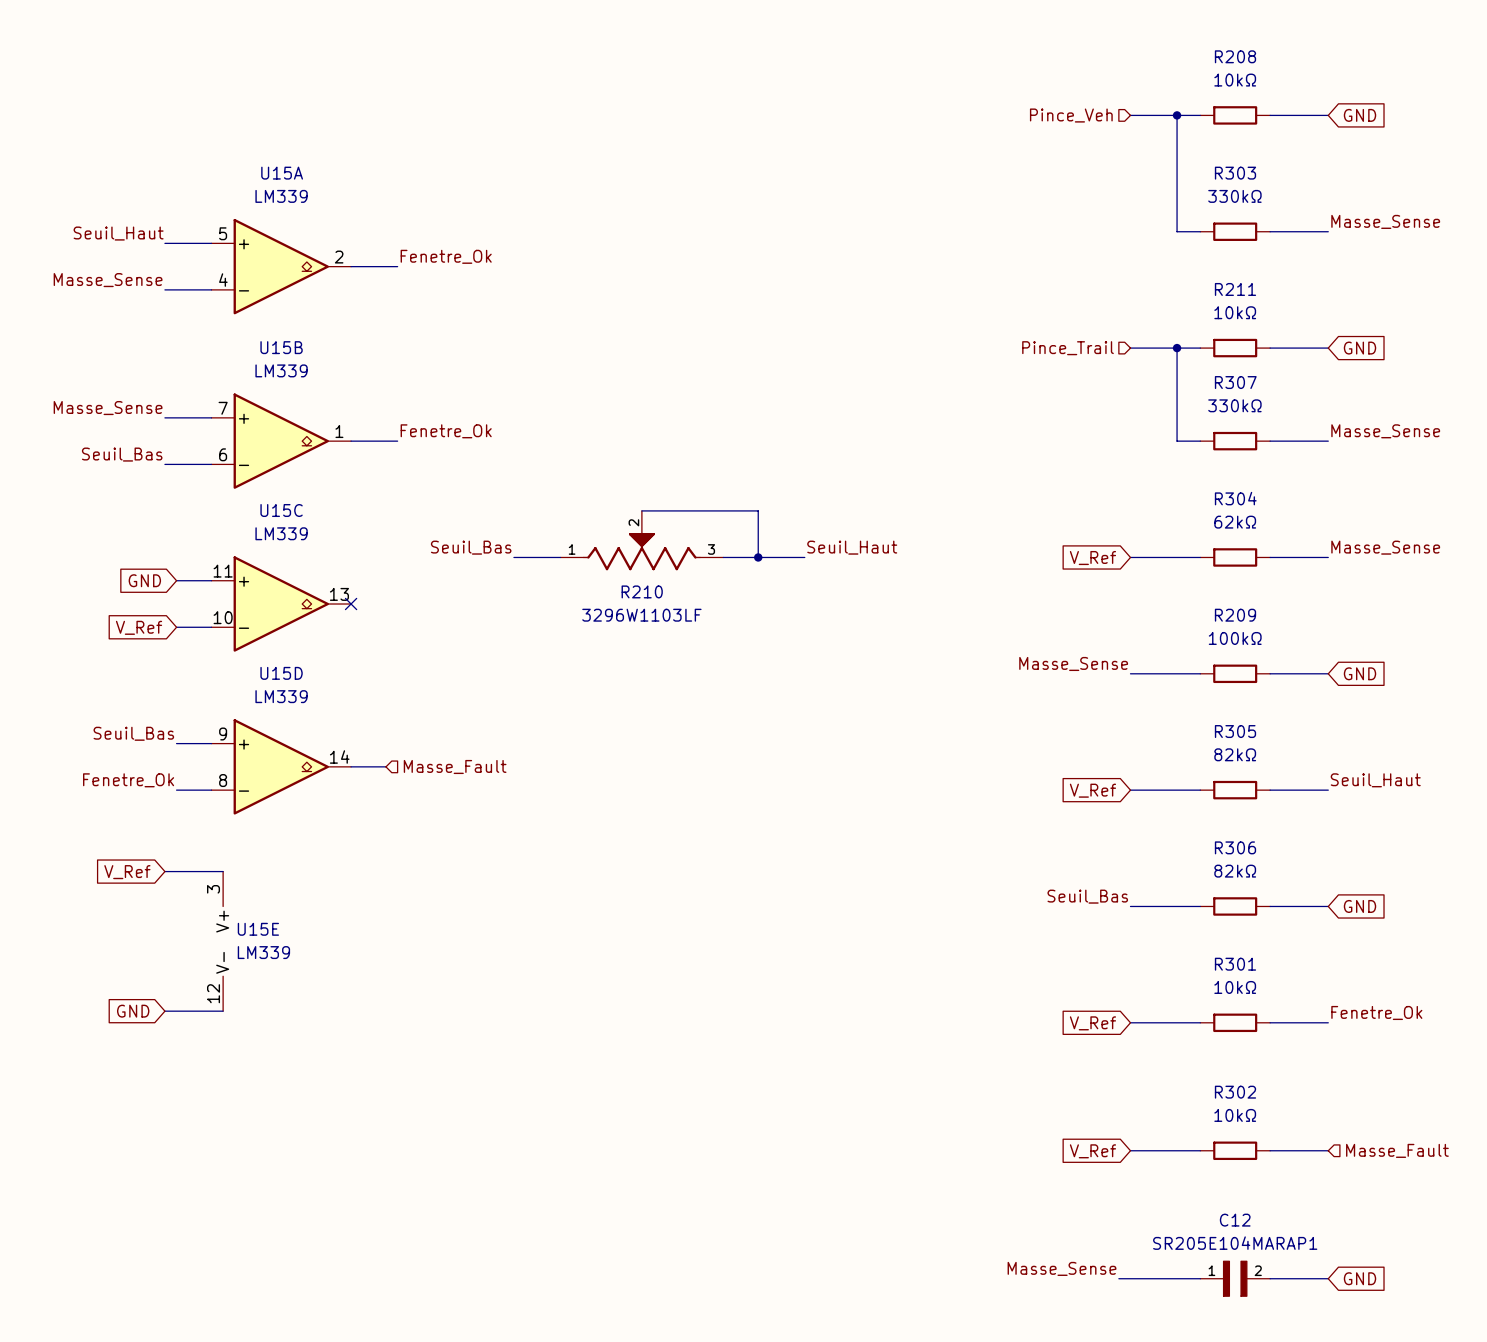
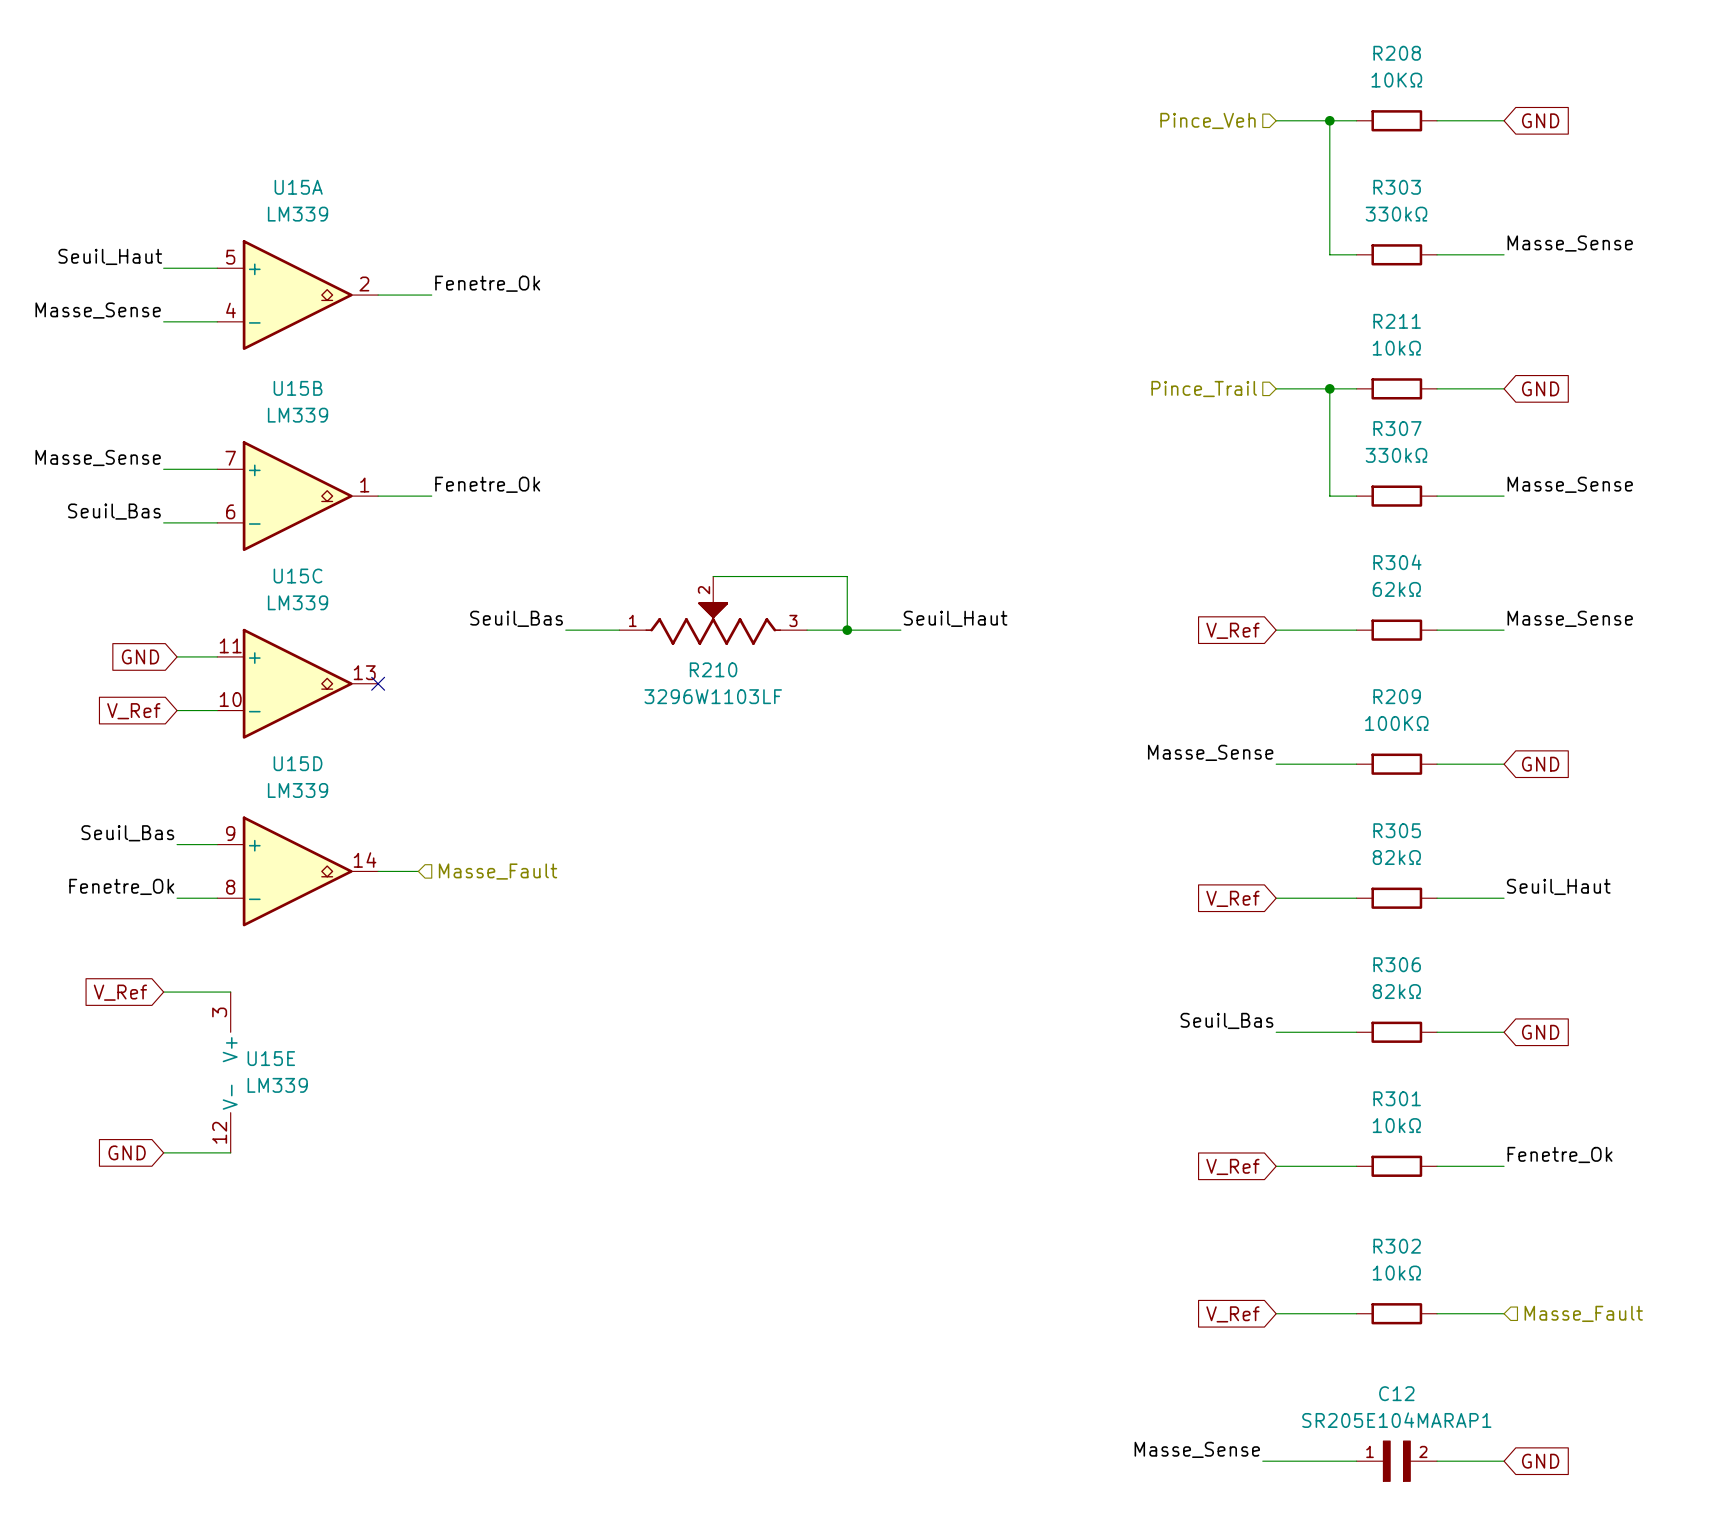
R208 value: 10kΩ (1235, 80) -> 10KΩ (1396, 80)
R209 value: 100kΩ (1235, 638) -> 100KΩ (1396, 723)

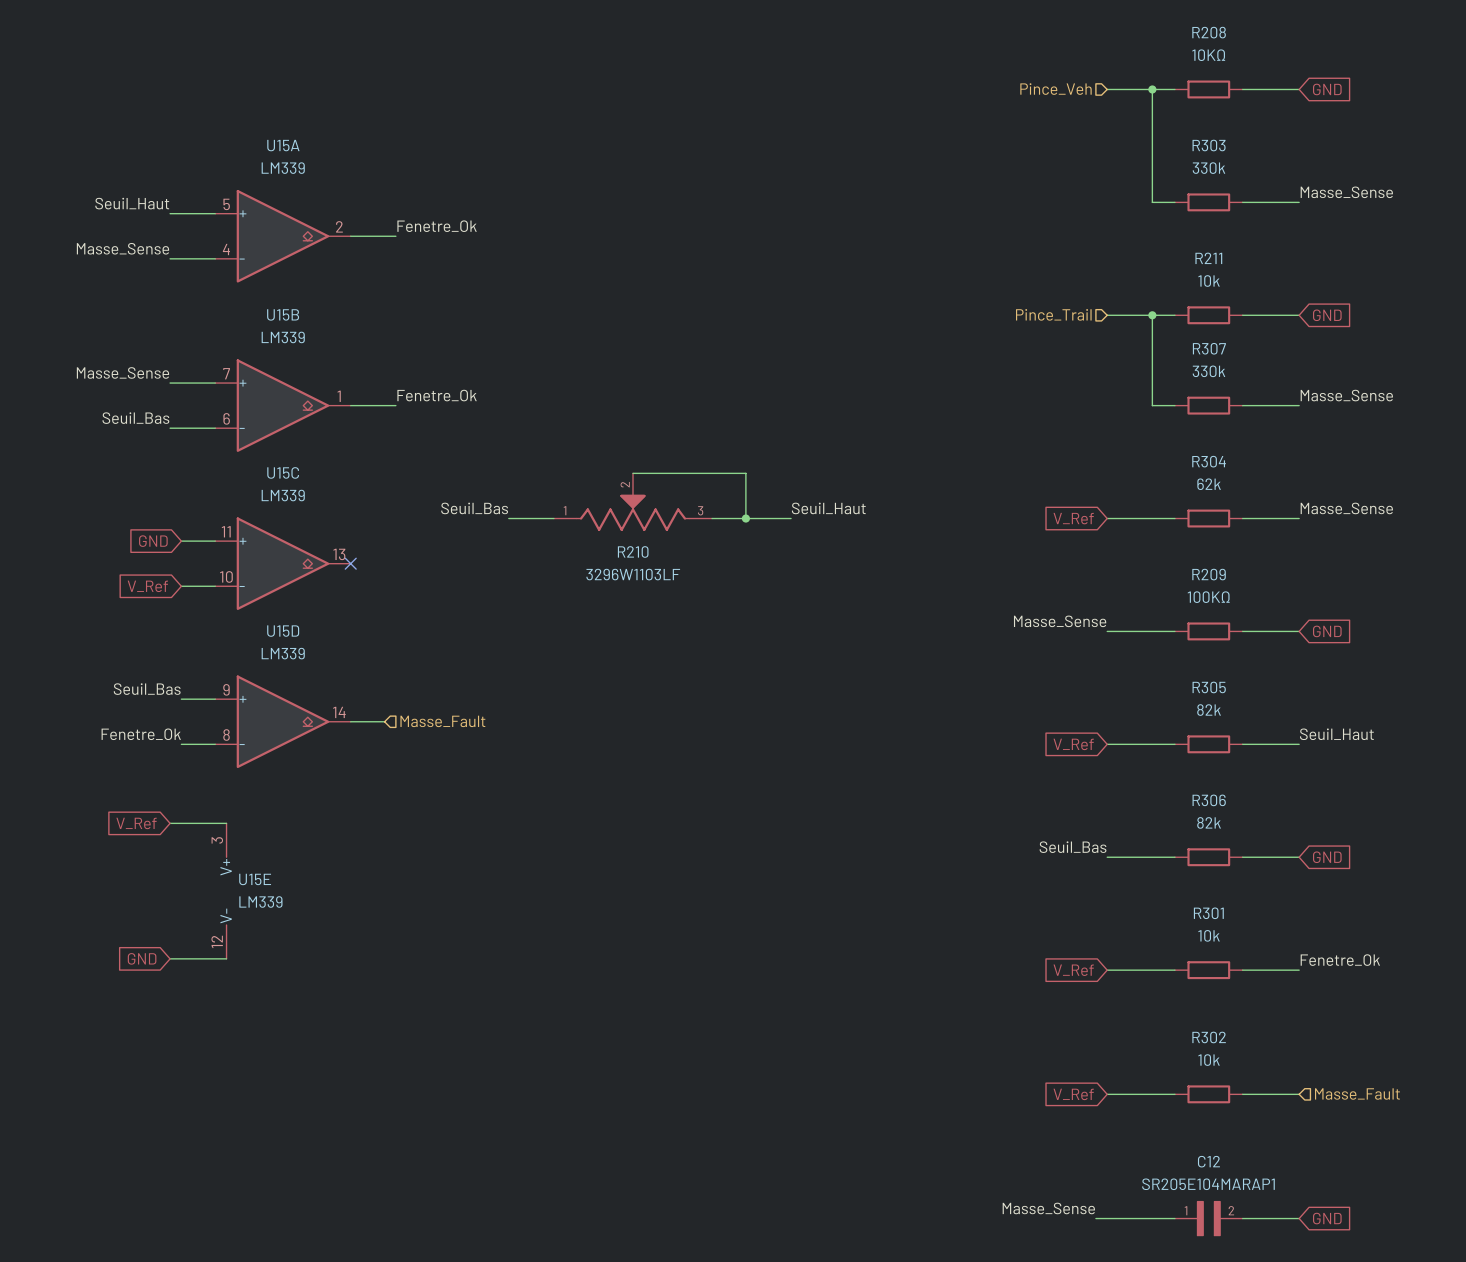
R303 value: 330kΩ (1396, 214) -> 330k (1208, 168)
R211 value: 10kΩ (1396, 348) -> 10k (1209, 281)
R307 value: 330kΩ (1396, 455) -> 330k (1208, 371)
R304 value: 62kΩ (1396, 589) -> 62k (1209, 484)
R305 value: 82kΩ (1396, 857) -> 82k (1209, 710)
R306 value: 82kΩ (1396, 991) -> 82k (1209, 822)
R301 value: 10kΩ (1396, 1125) -> 10k (1209, 935)
R302 value: 10kΩ (1396, 1273) -> 10k (1209, 1060)

